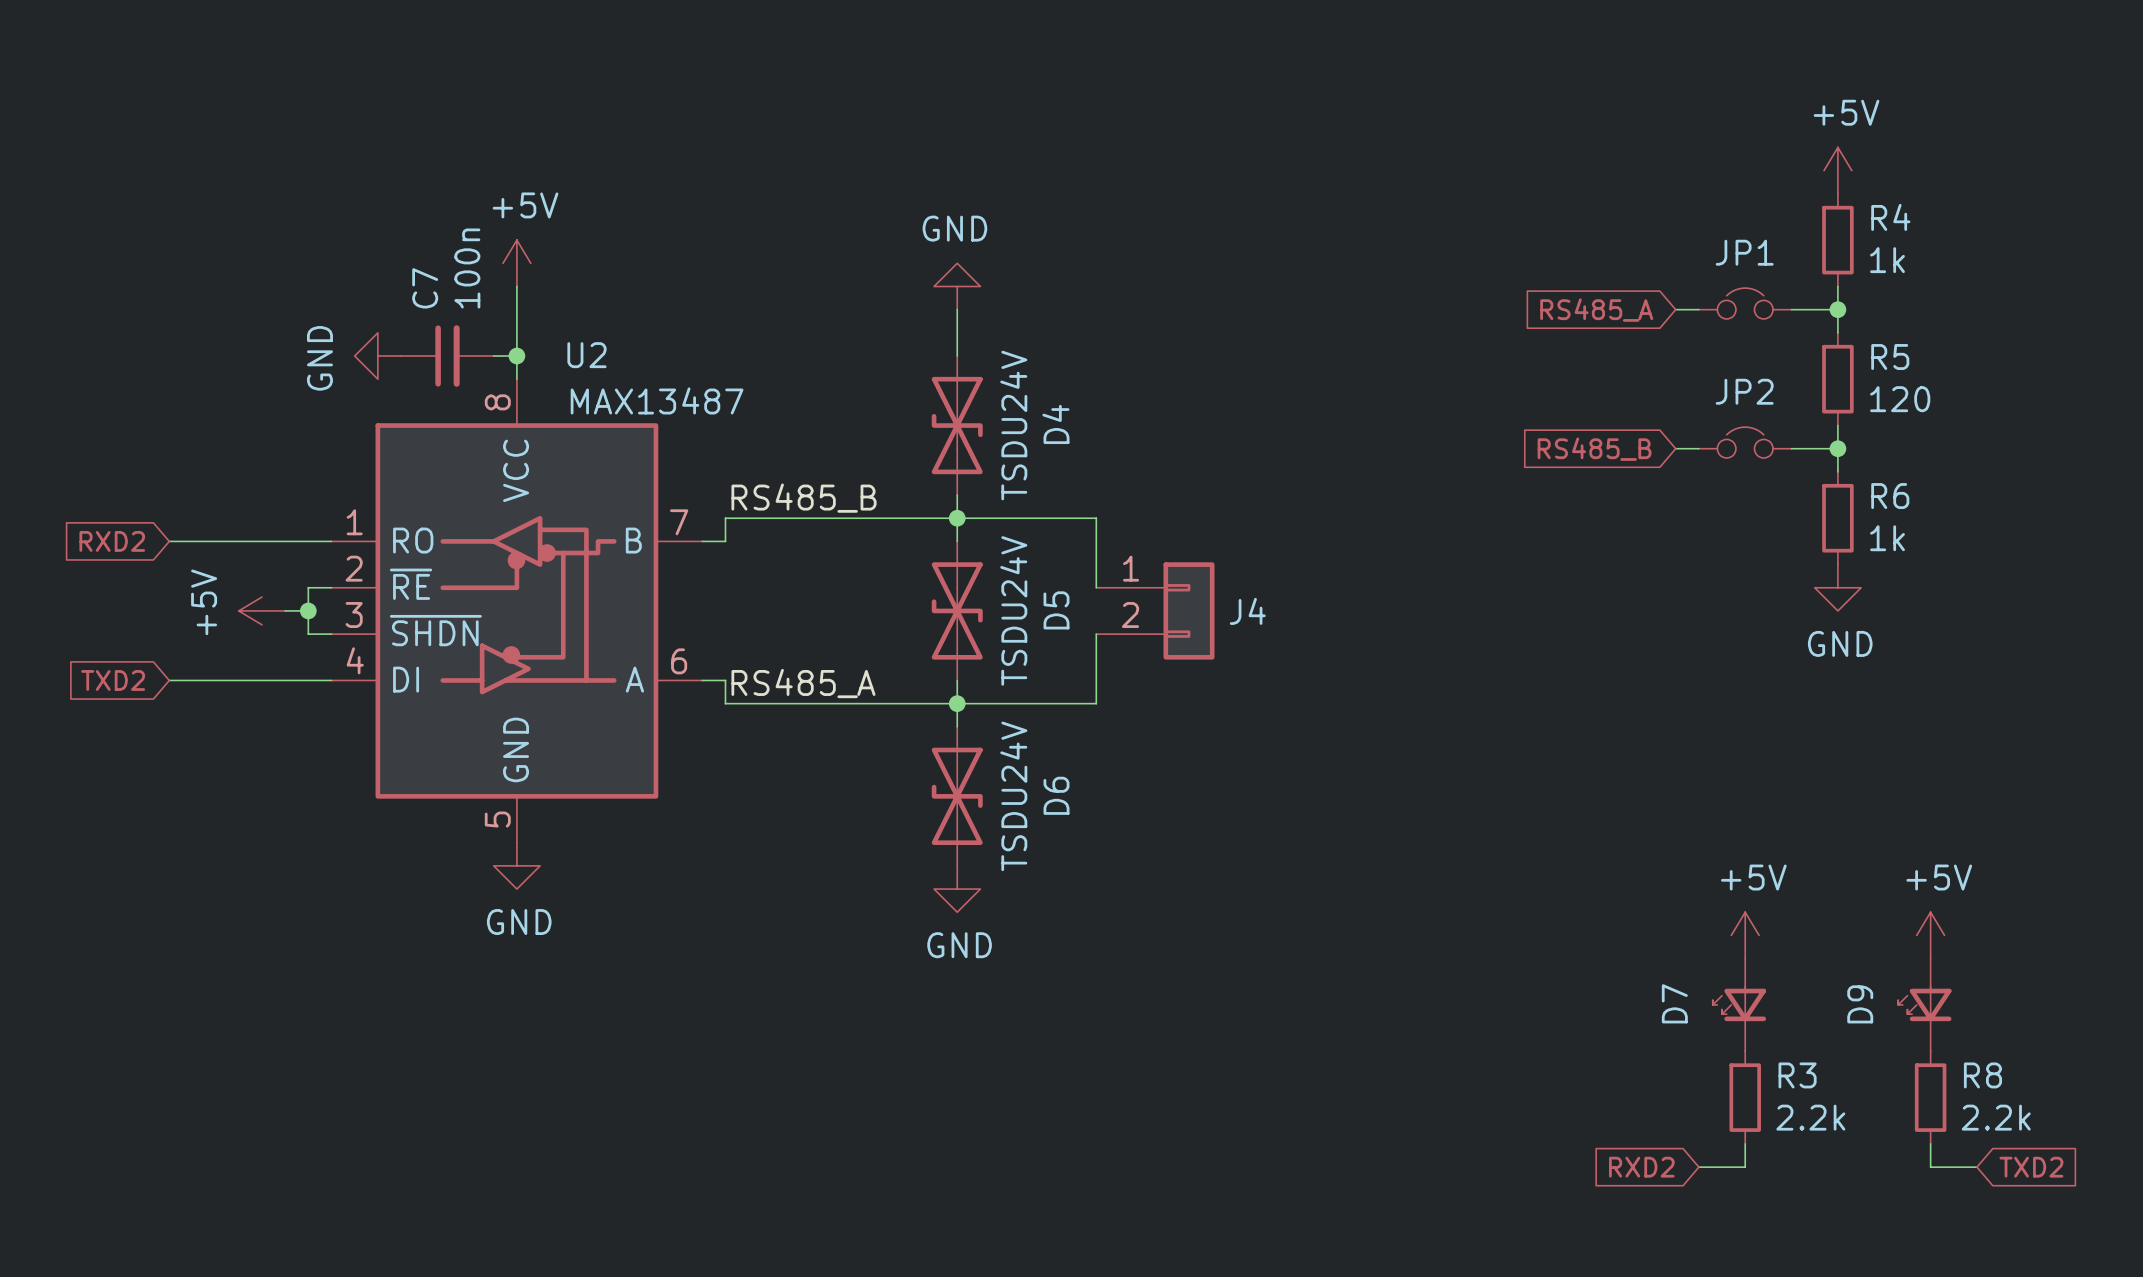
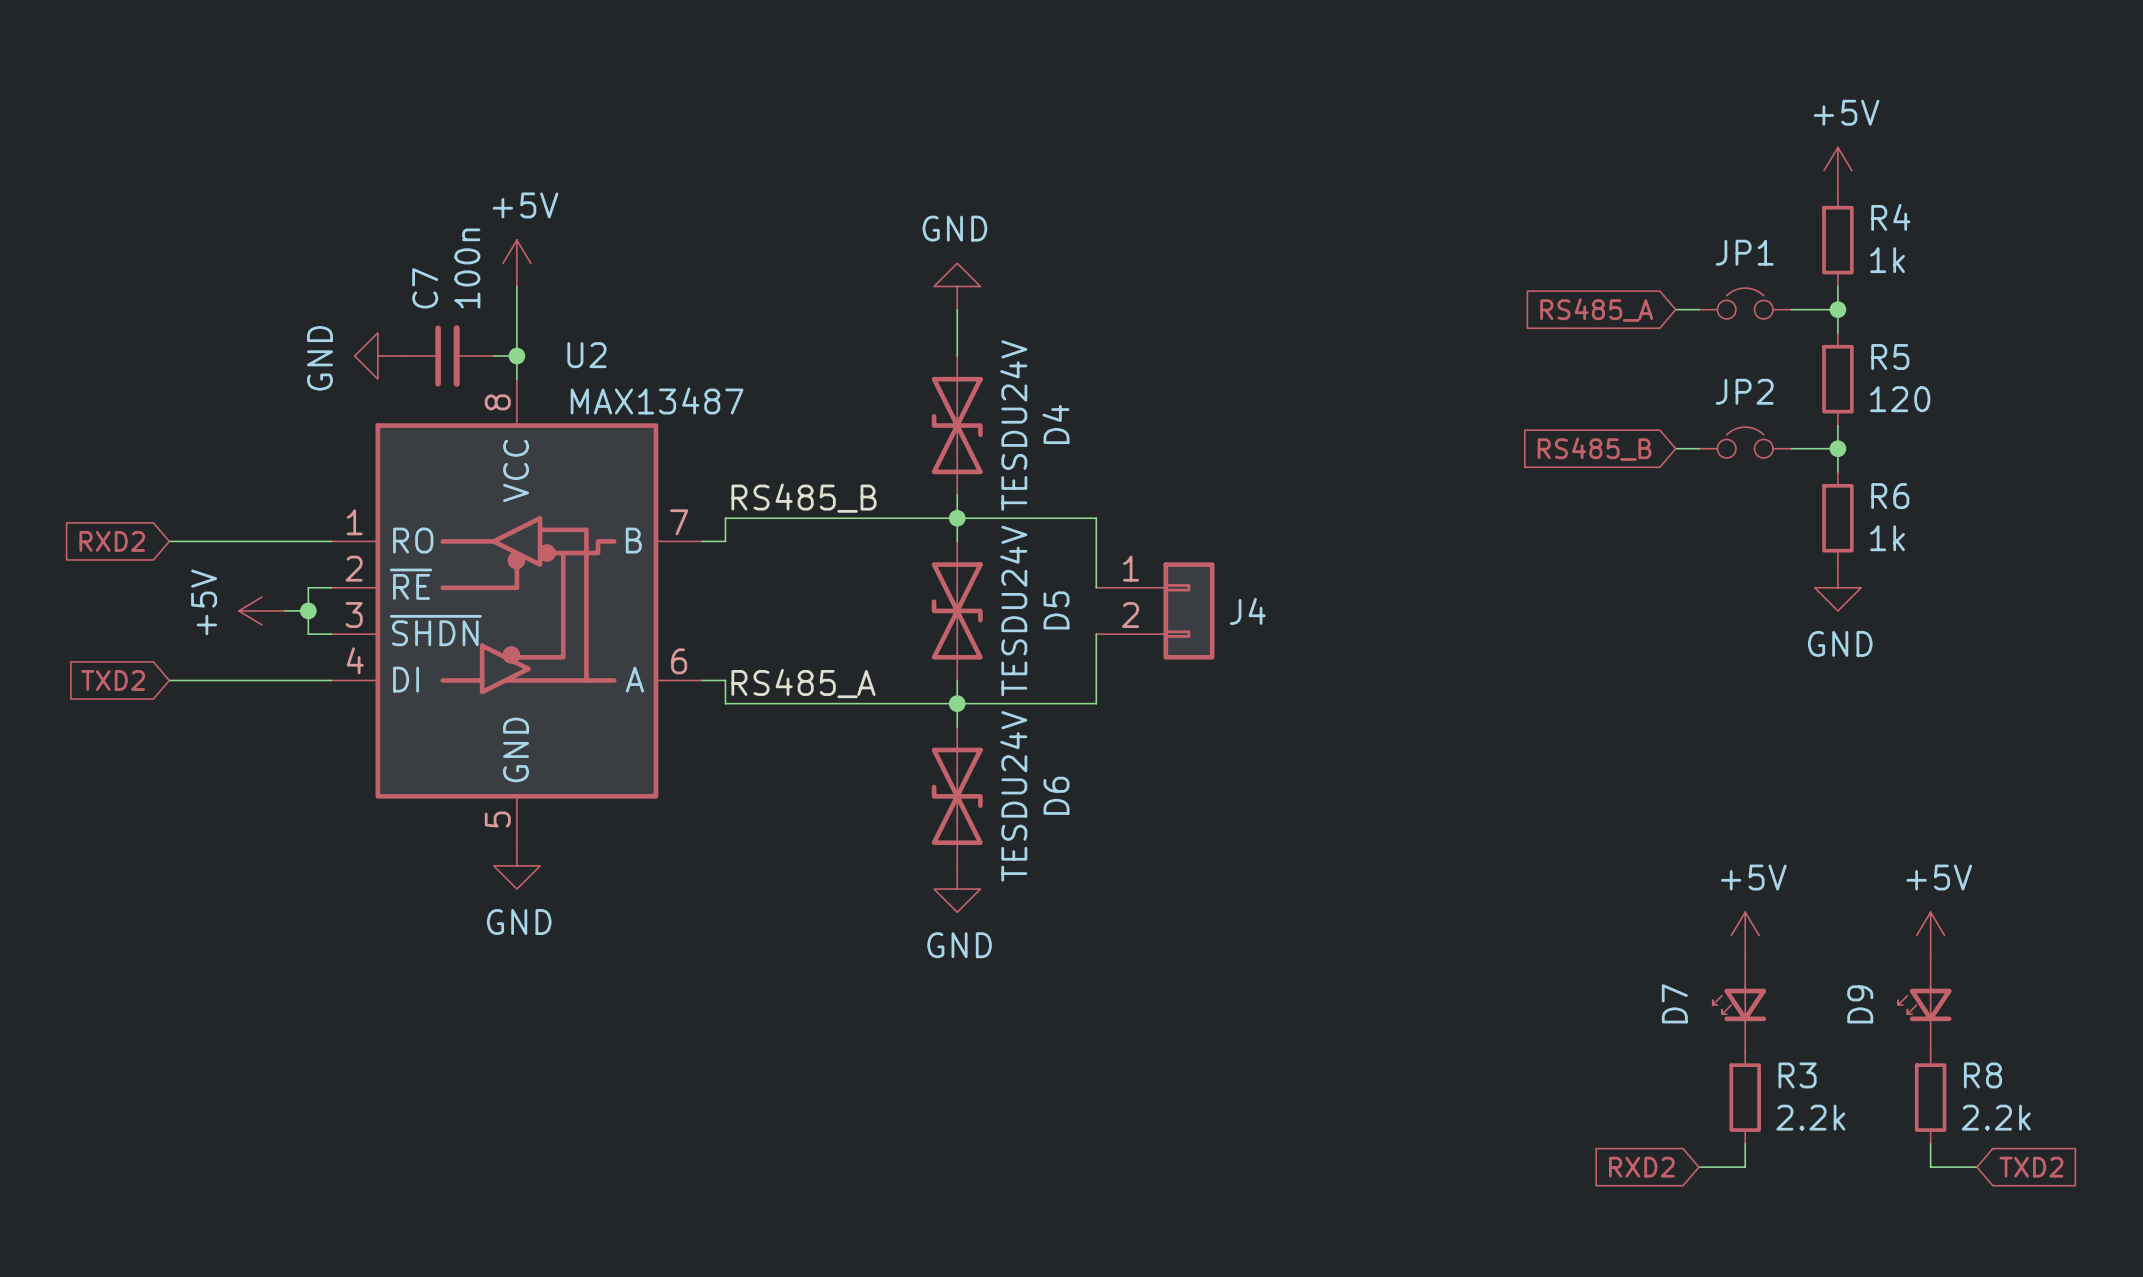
D4 value: TSDU24V (1013, 425) -> TESDU24V (1013, 425)
D5 value: TSDU24V (1013, 610) -> TESDU24V (1013, 610)
D6 value: TSDU24V (1013, 796) -> TESDU24V (1013, 796)

